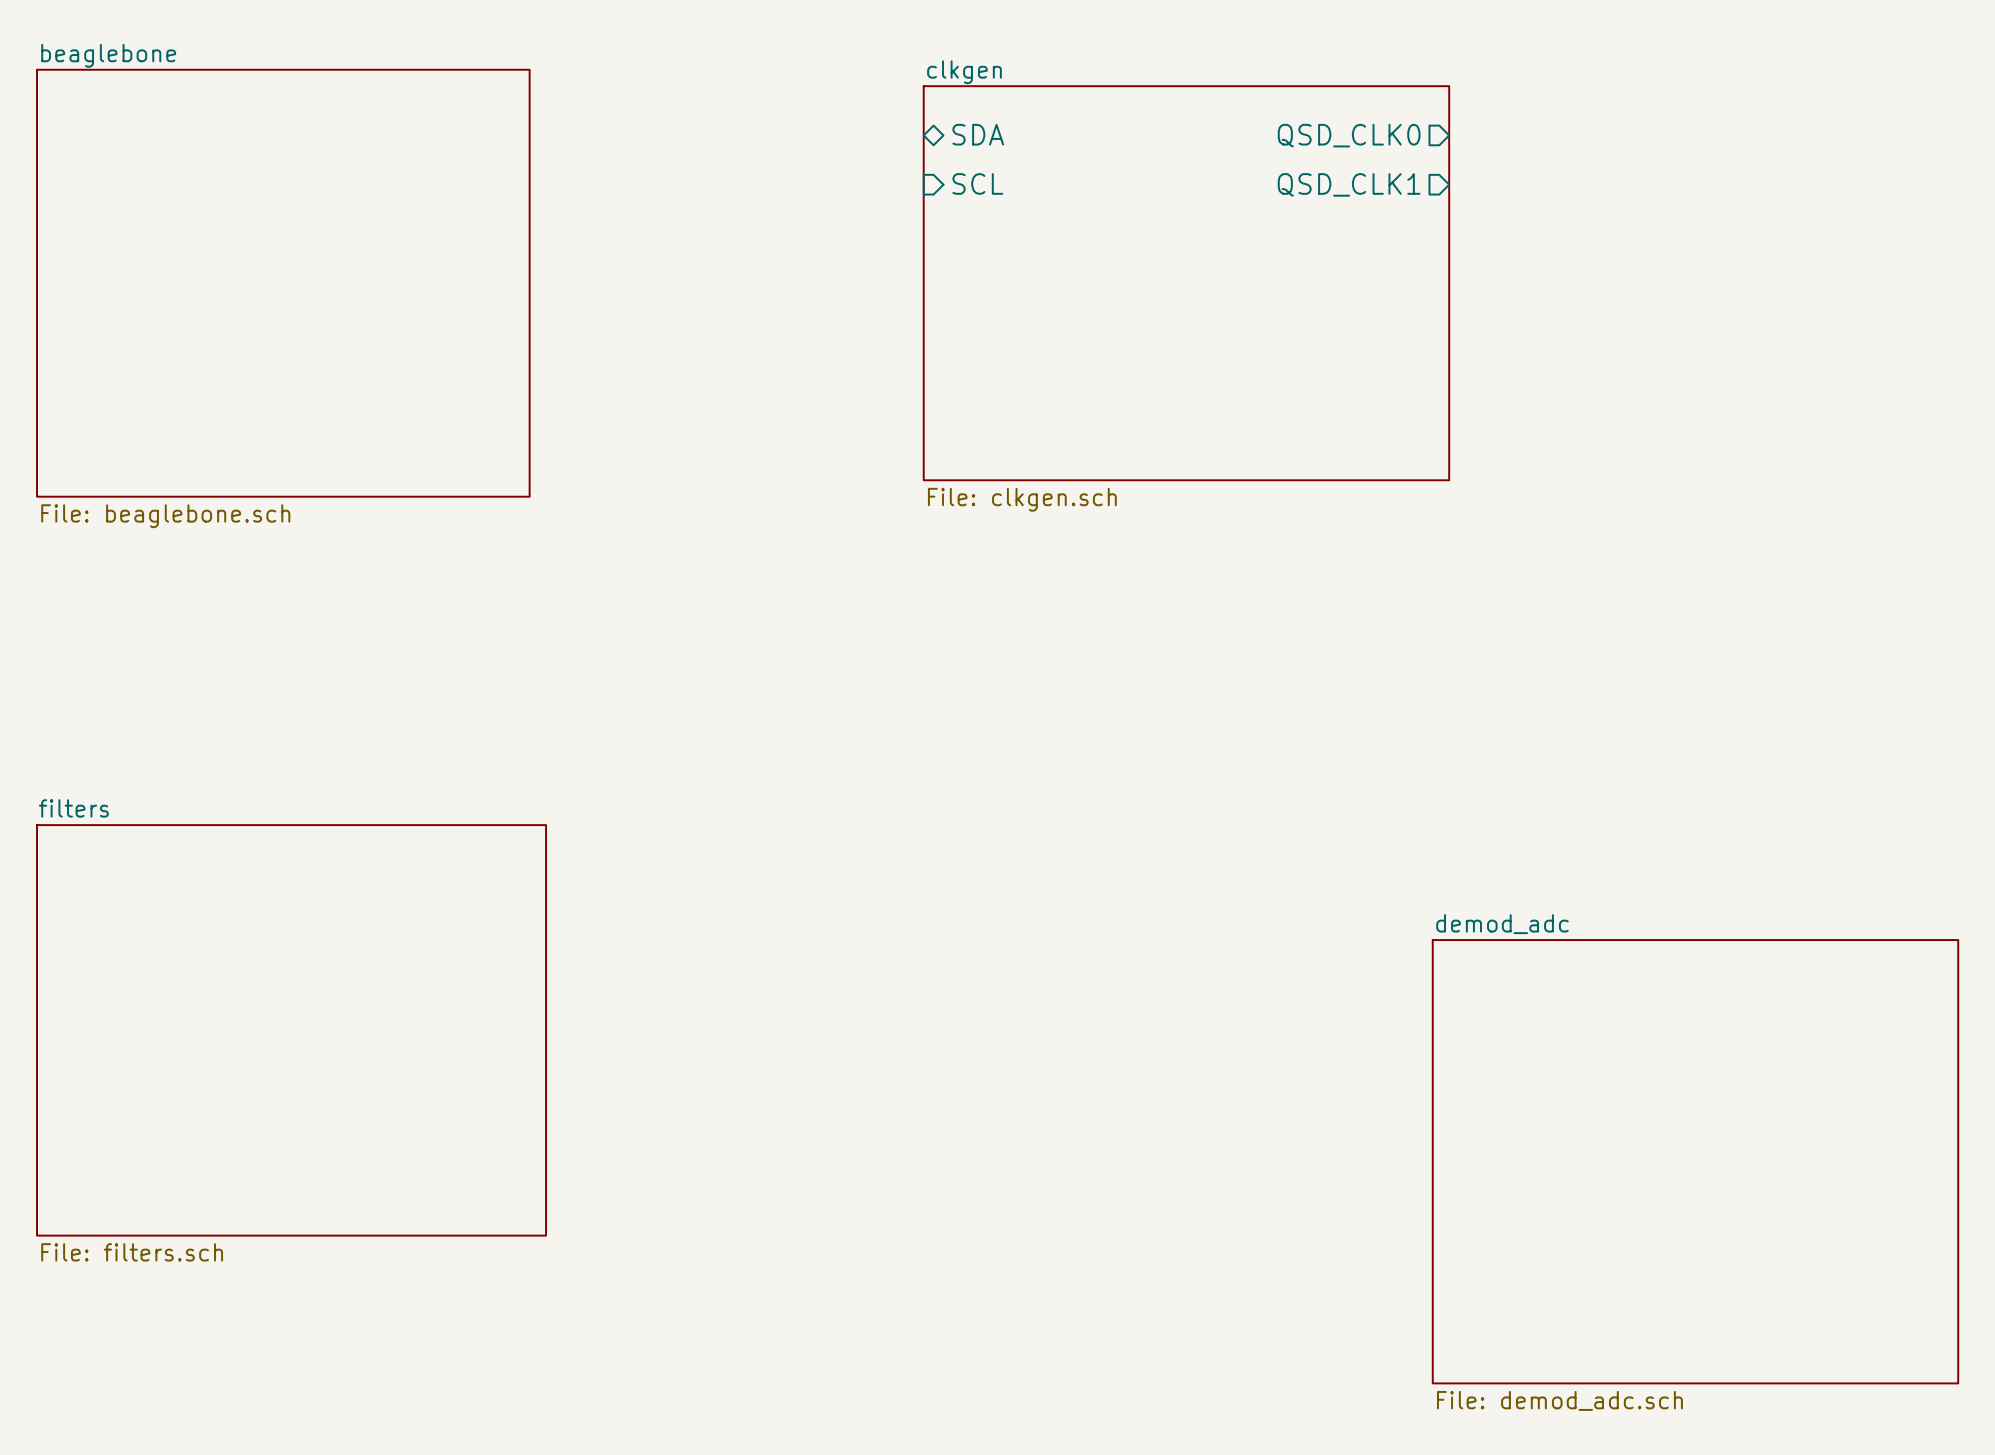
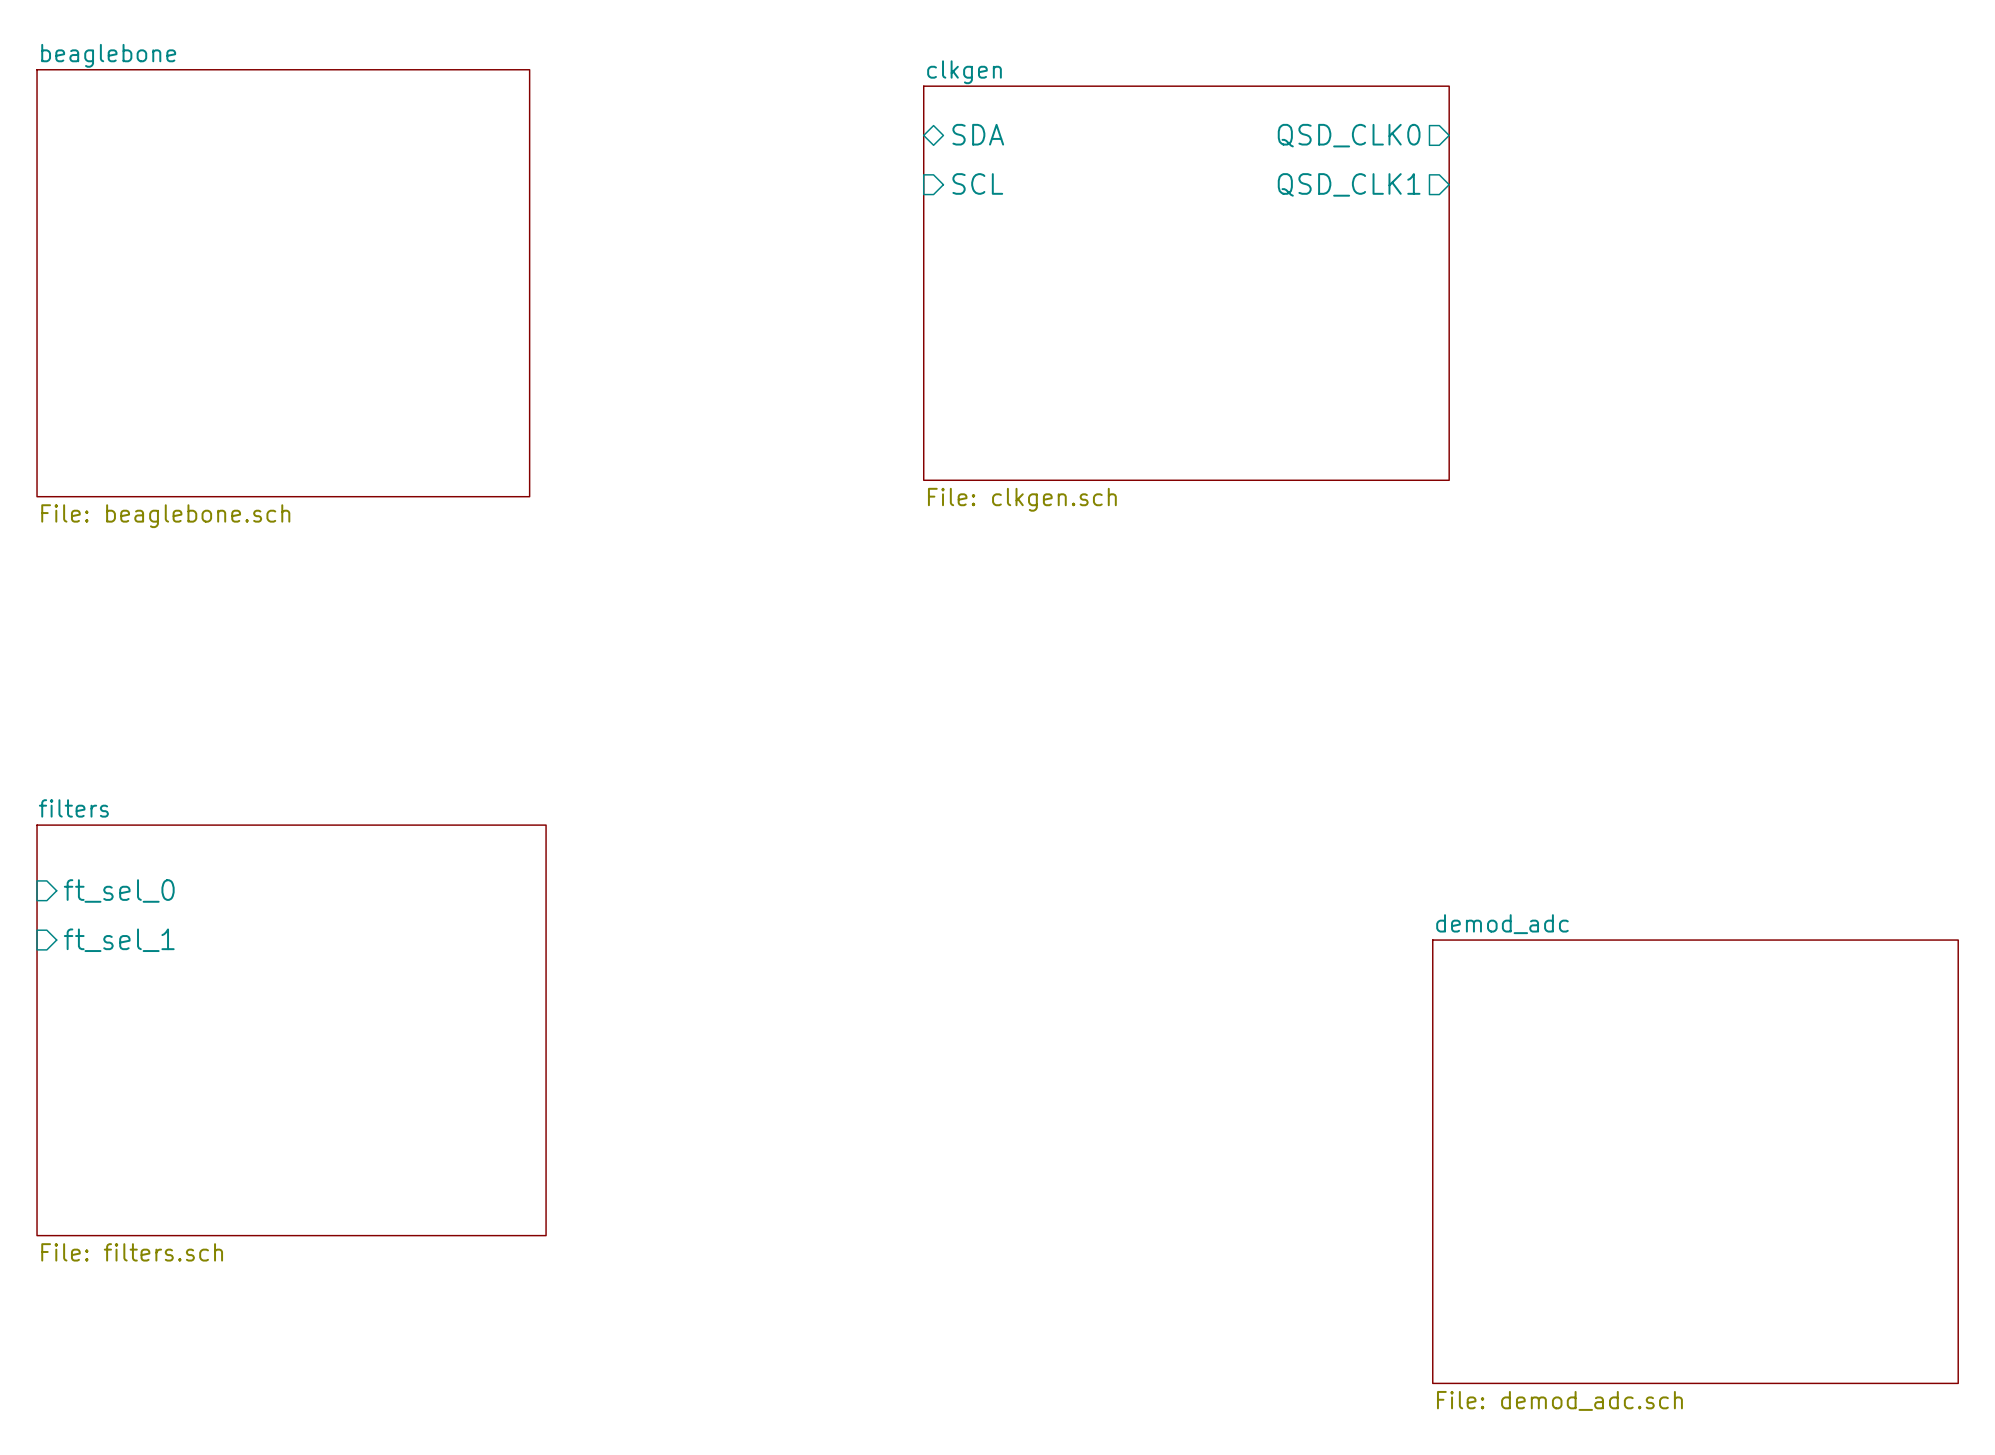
sheet pin: none -> ft_sel_0 (119, 890)
sheet pin: none -> ft_sel_1 (119, 940)

